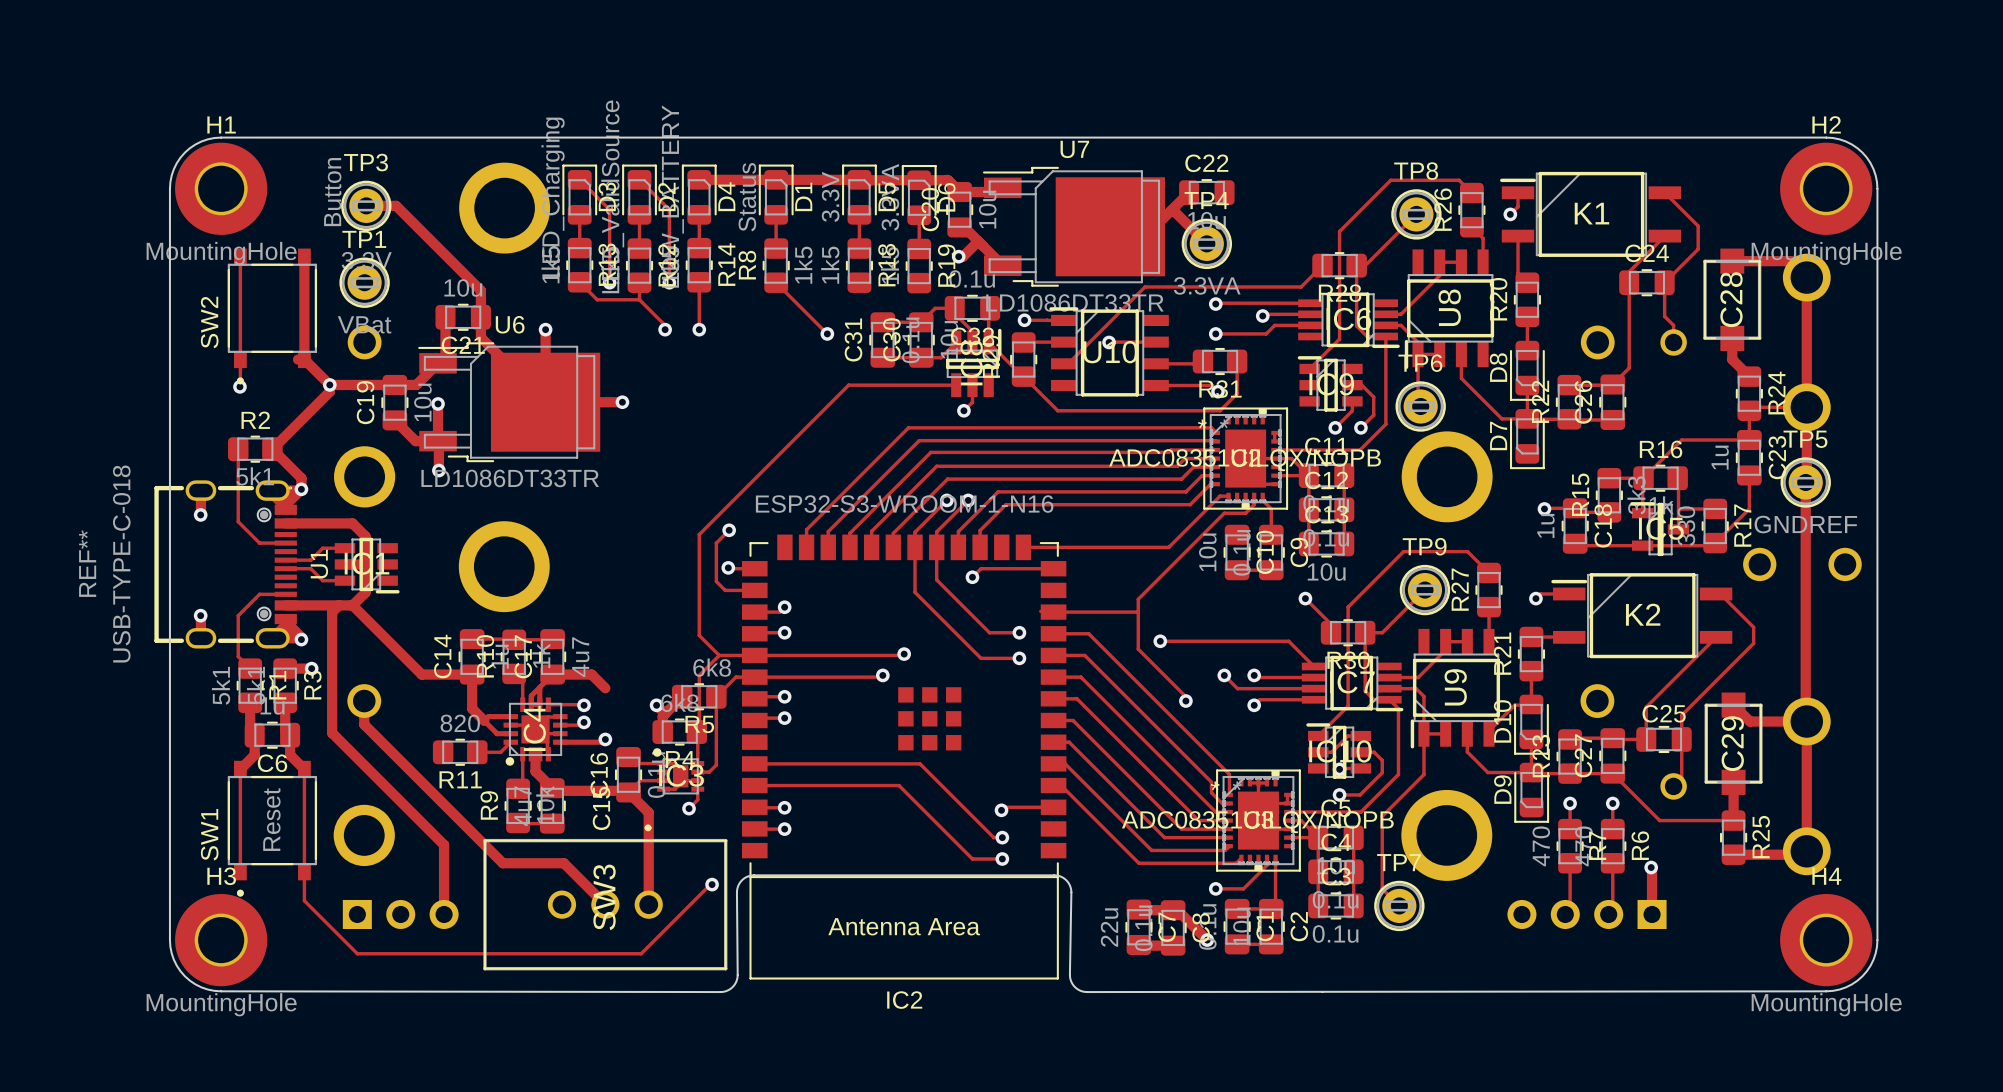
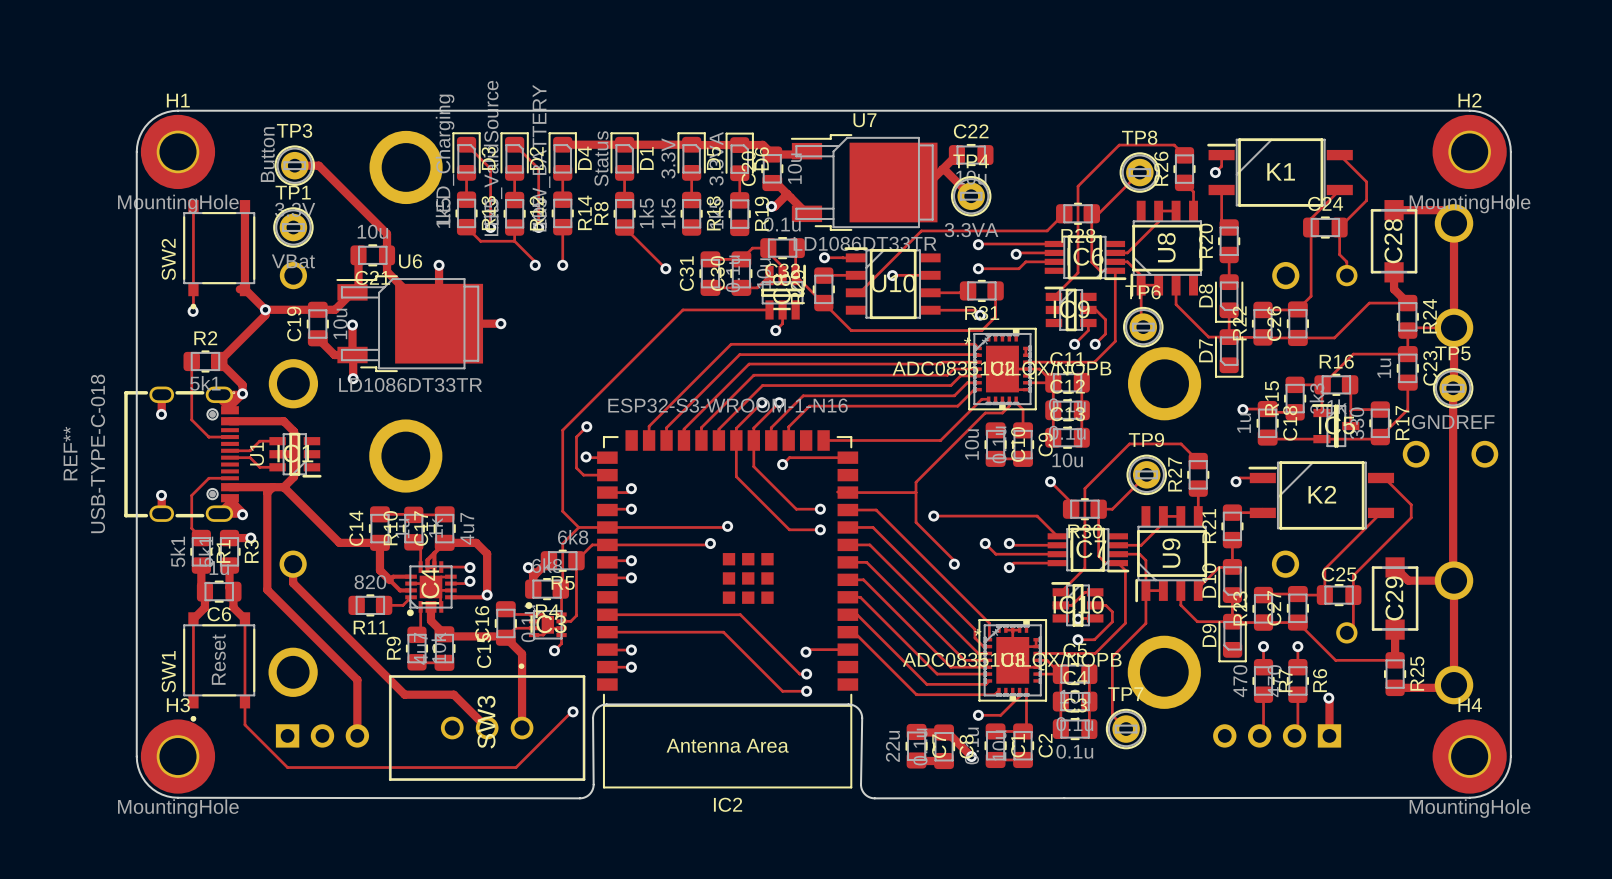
track: none -> (1407, 303) (1369, 303) (1334, 337) (1297, 337)
track: none -> (487, 553) (487, 595)

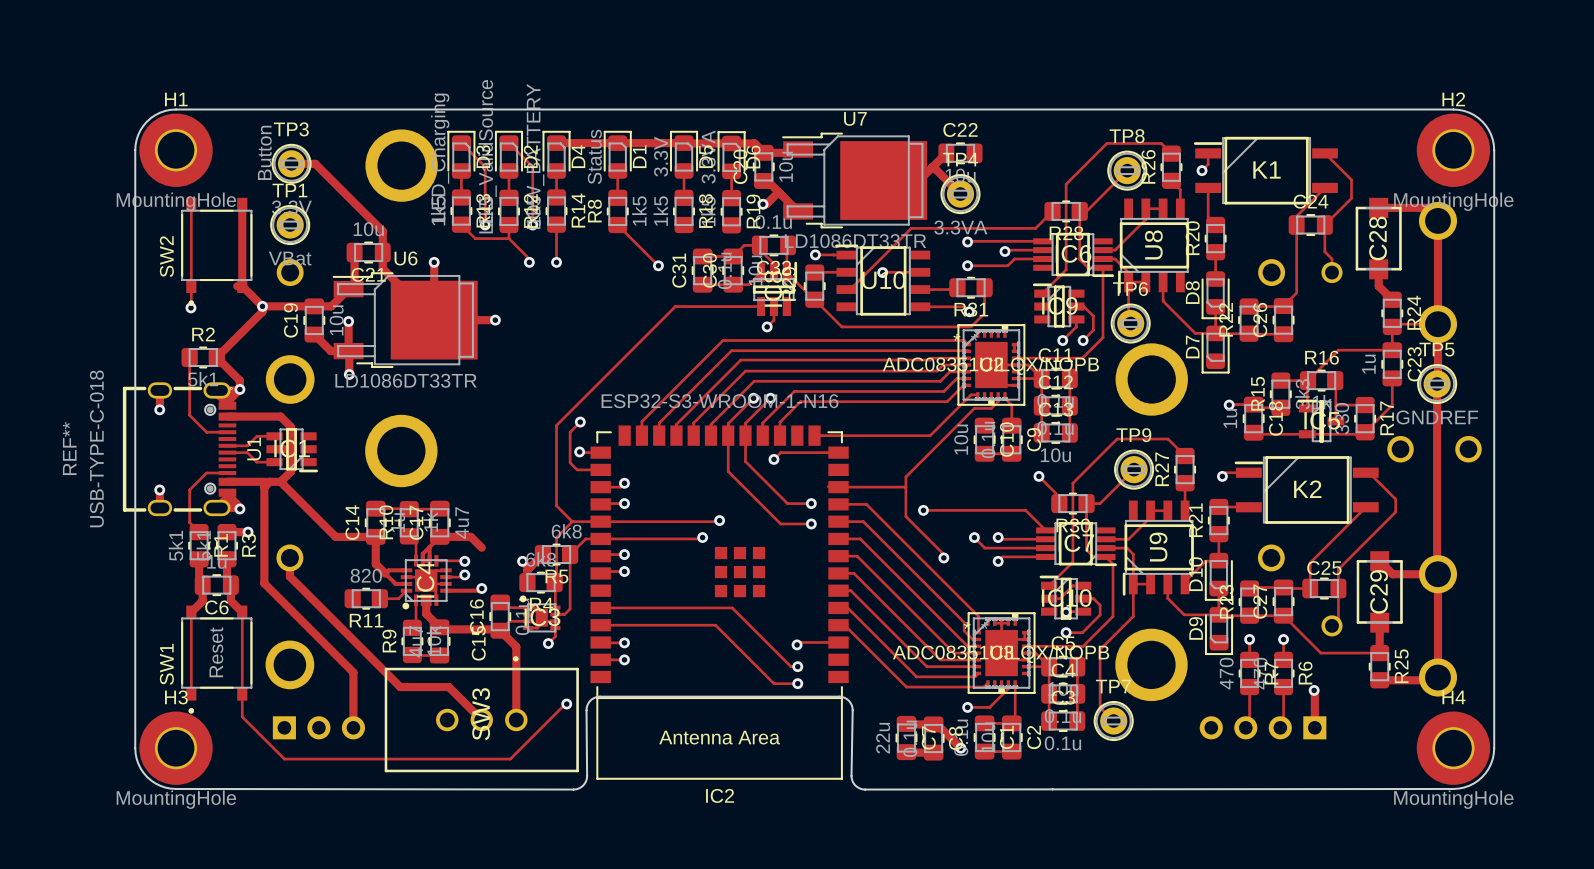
track: (1407, 303) (1369, 303) (1334, 337) (1297, 337) -> none
track: (487, 553) (487, 595) -> none

